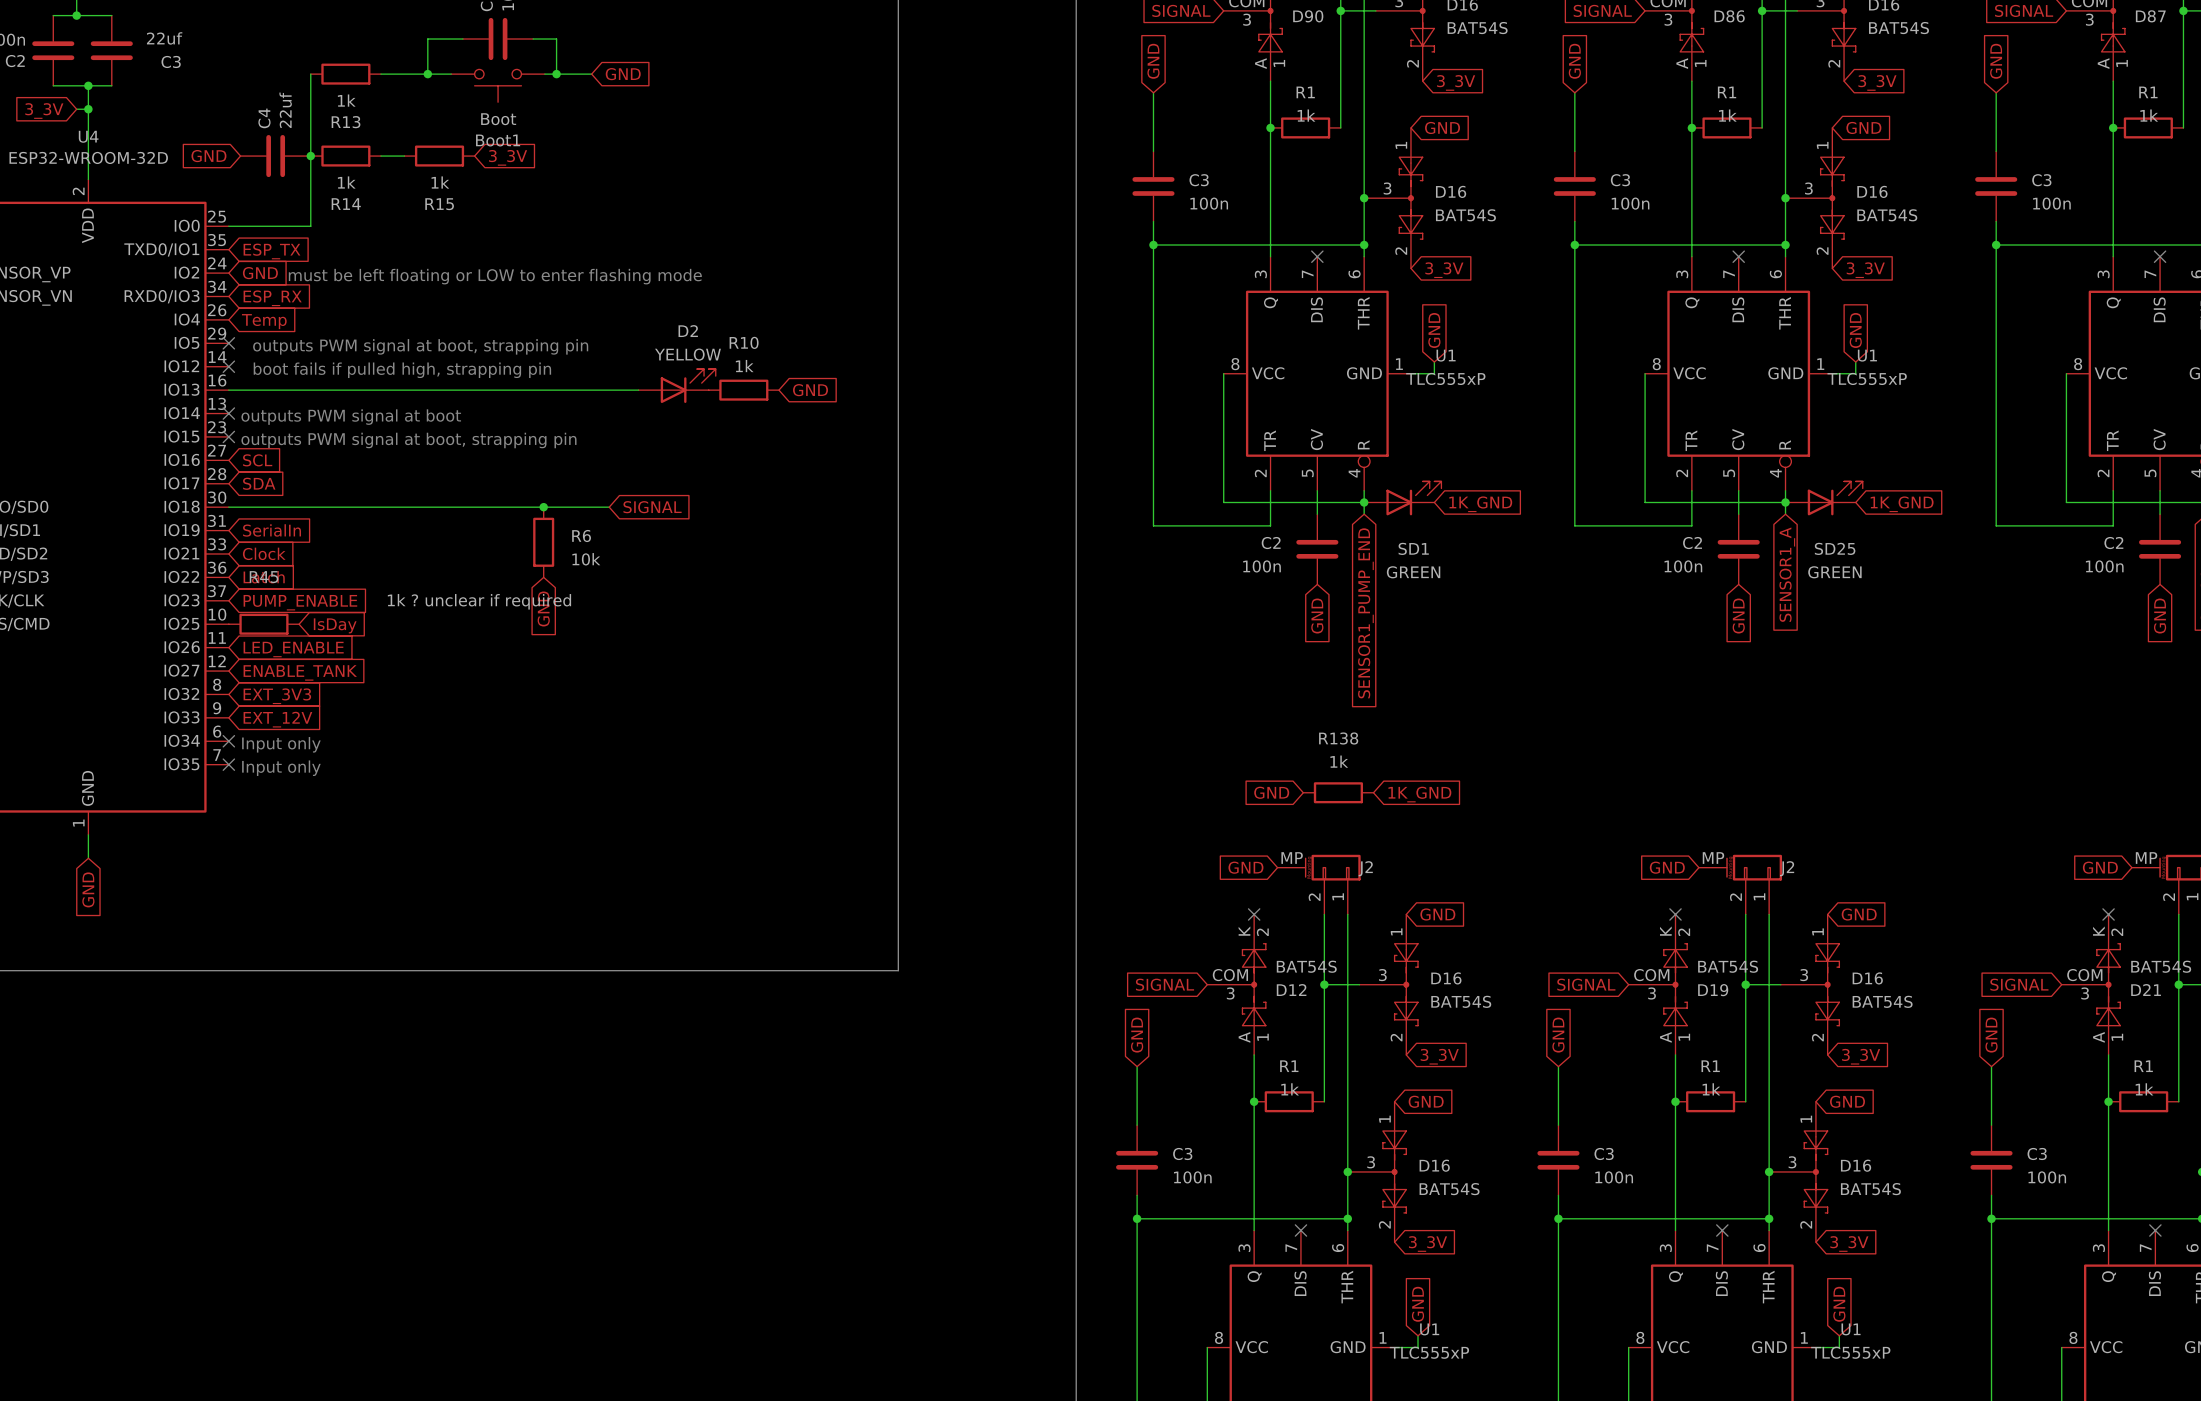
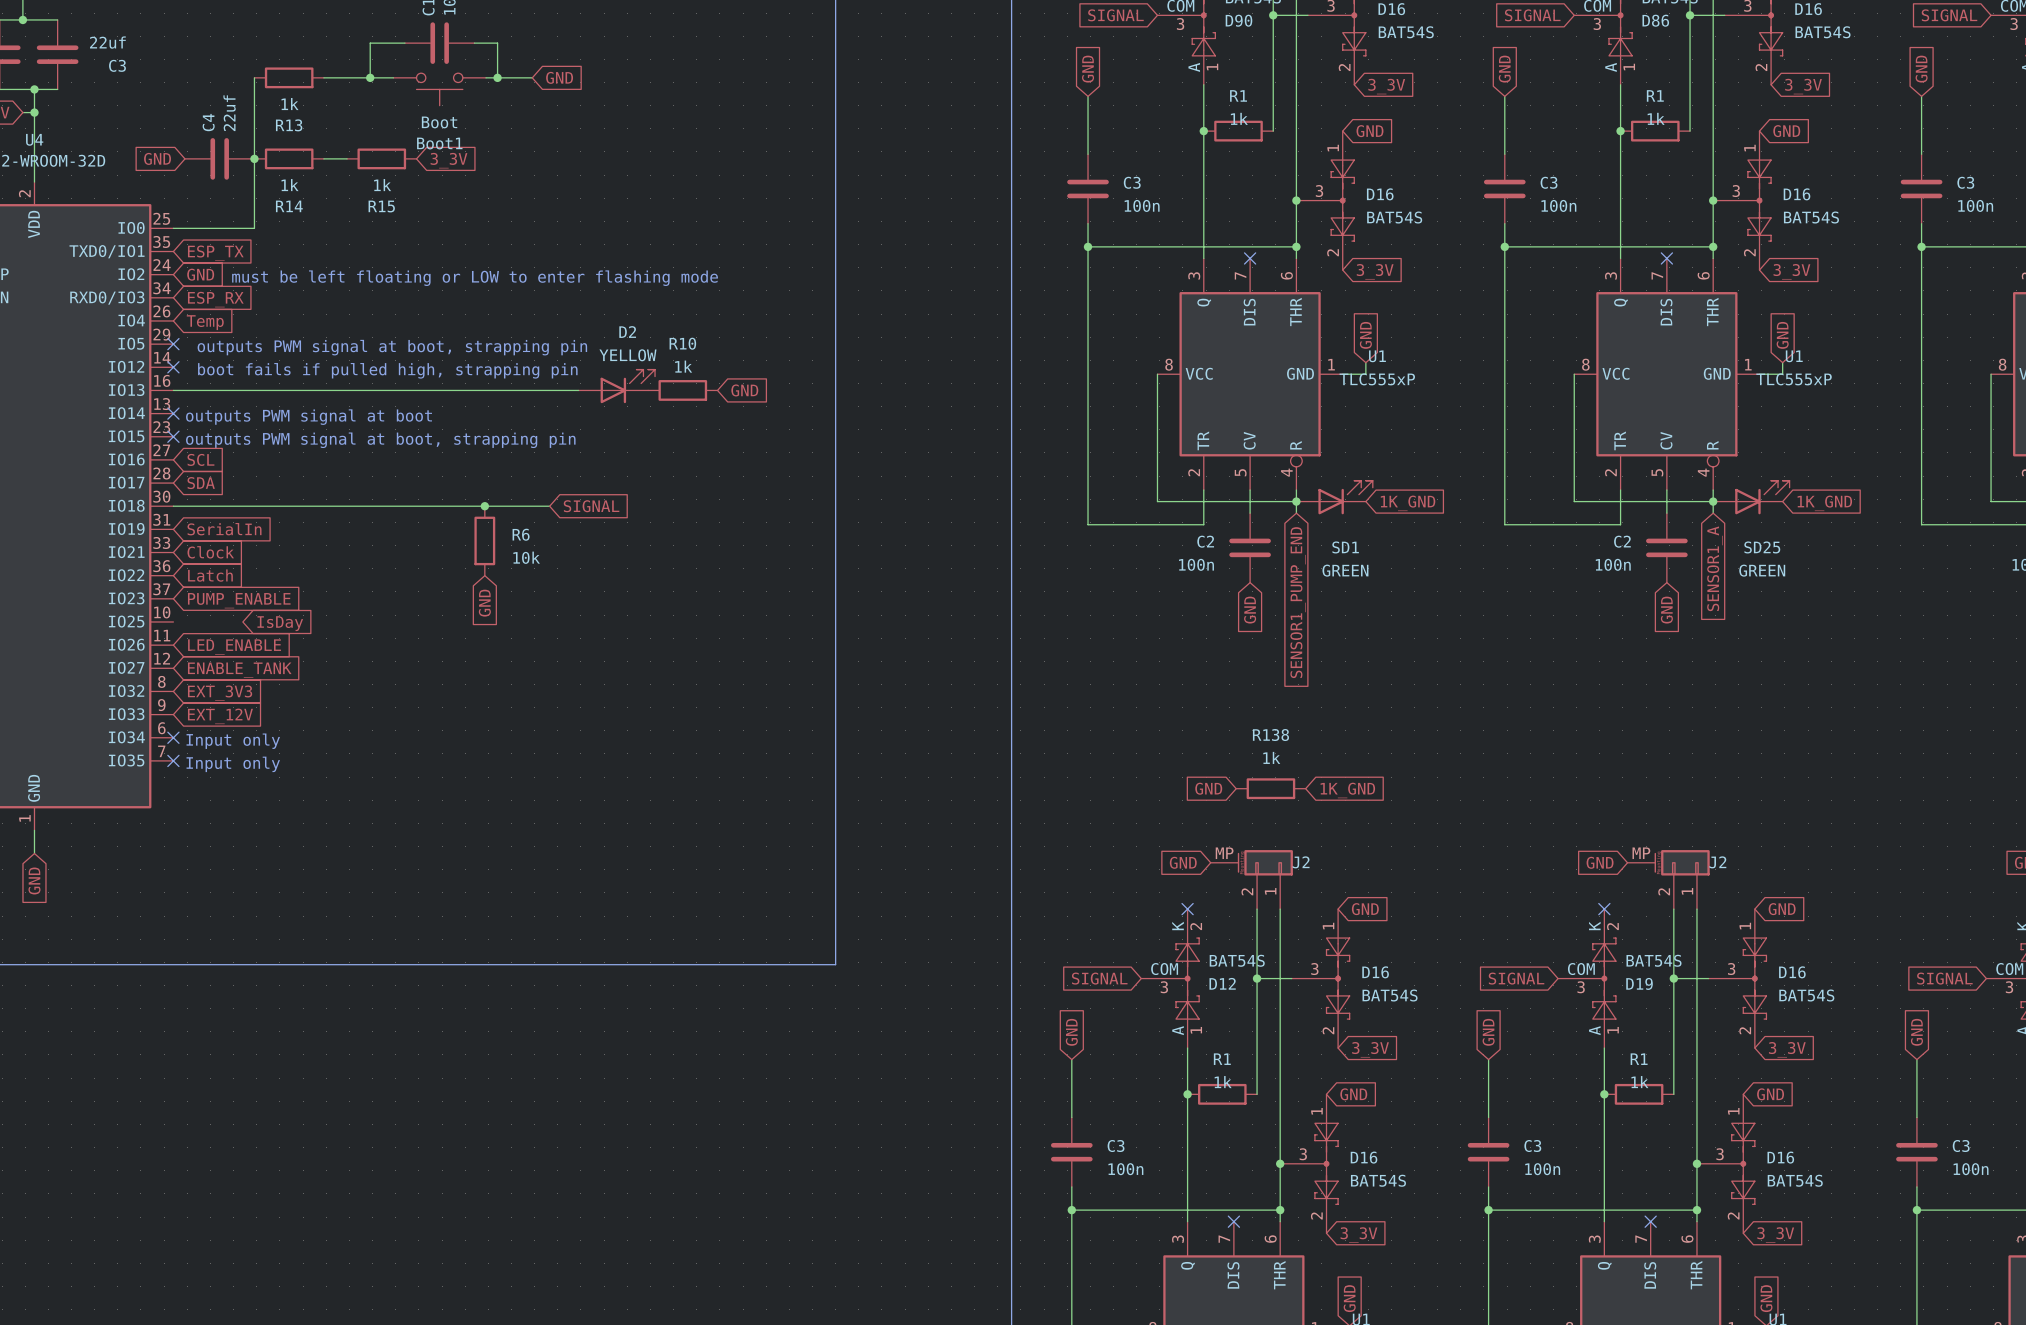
R45: 1k ? unclear if required (263, 624) -> none

